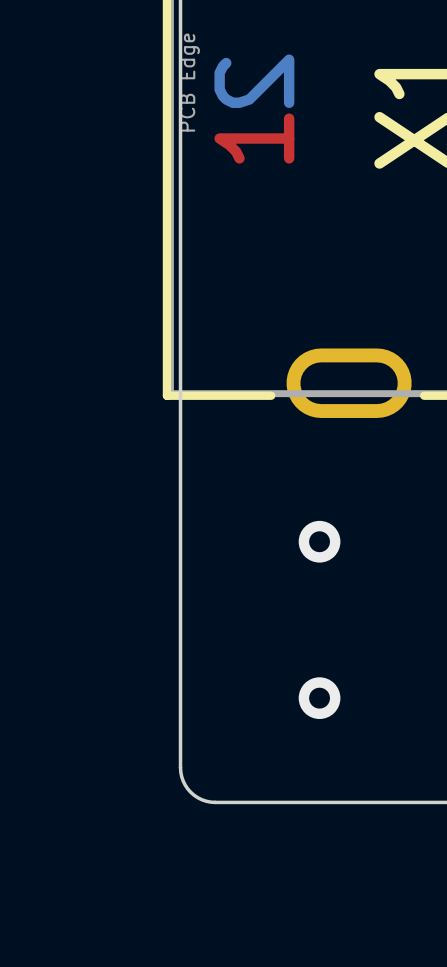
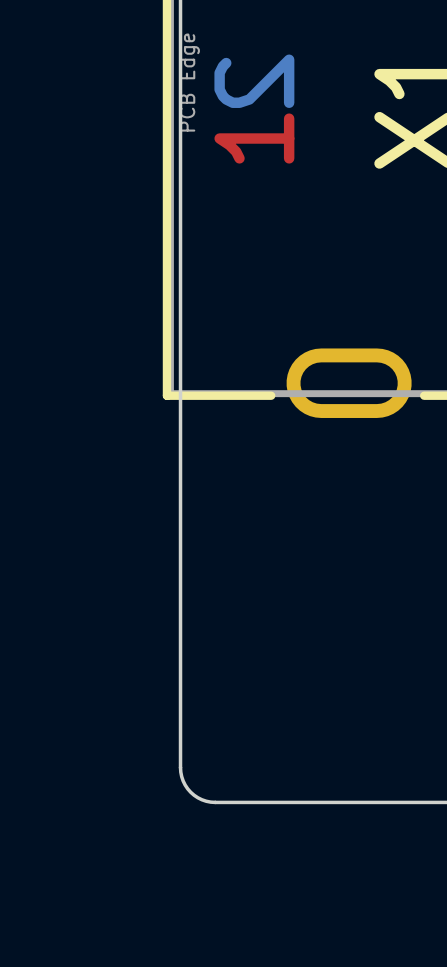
via: (319, 541) -> none
via: (319, 698) -> none

